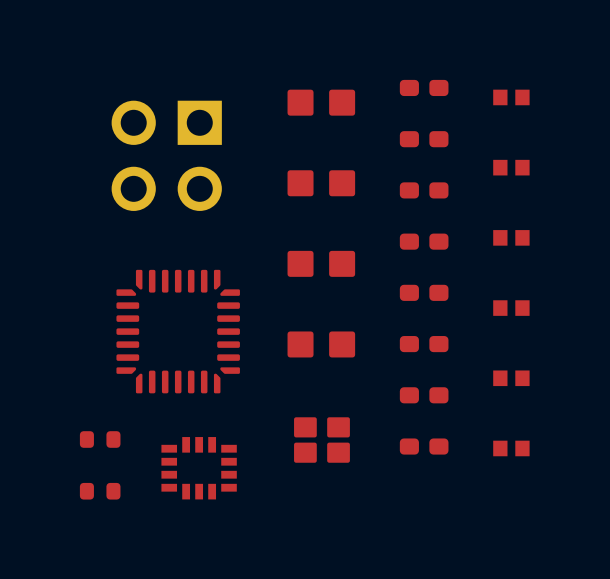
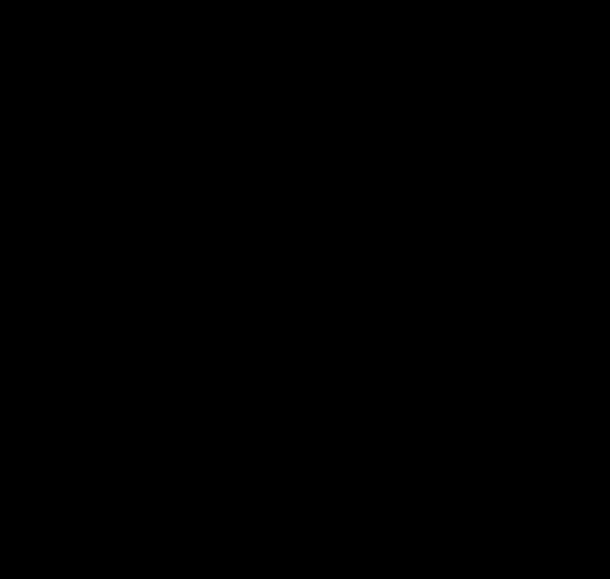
part: (424, 87) -> none
part: (511, 97) -> none
part: (321, 102) -> none
part: (424, 139) -> none
part: (166, 155) -> none
part: (511, 167) -> none
part: (321, 183) -> none
part: (424, 190) -> none
part: (511, 237) -> none
part: (424, 241) -> none
part: (321, 263) -> none
part: (424, 292) -> none
part: (511, 308) -> none
part: (178, 331) -> none
part: (321, 344) -> none
part: (424, 344) -> none
part: (511, 378) -> none
part: (424, 395) -> none
part: (100, 439) -> none
part: (321, 440) -> none
part: (424, 446) -> none
part: (511, 448) -> none
part: (199, 468) -> none
part: (100, 491) -> none

